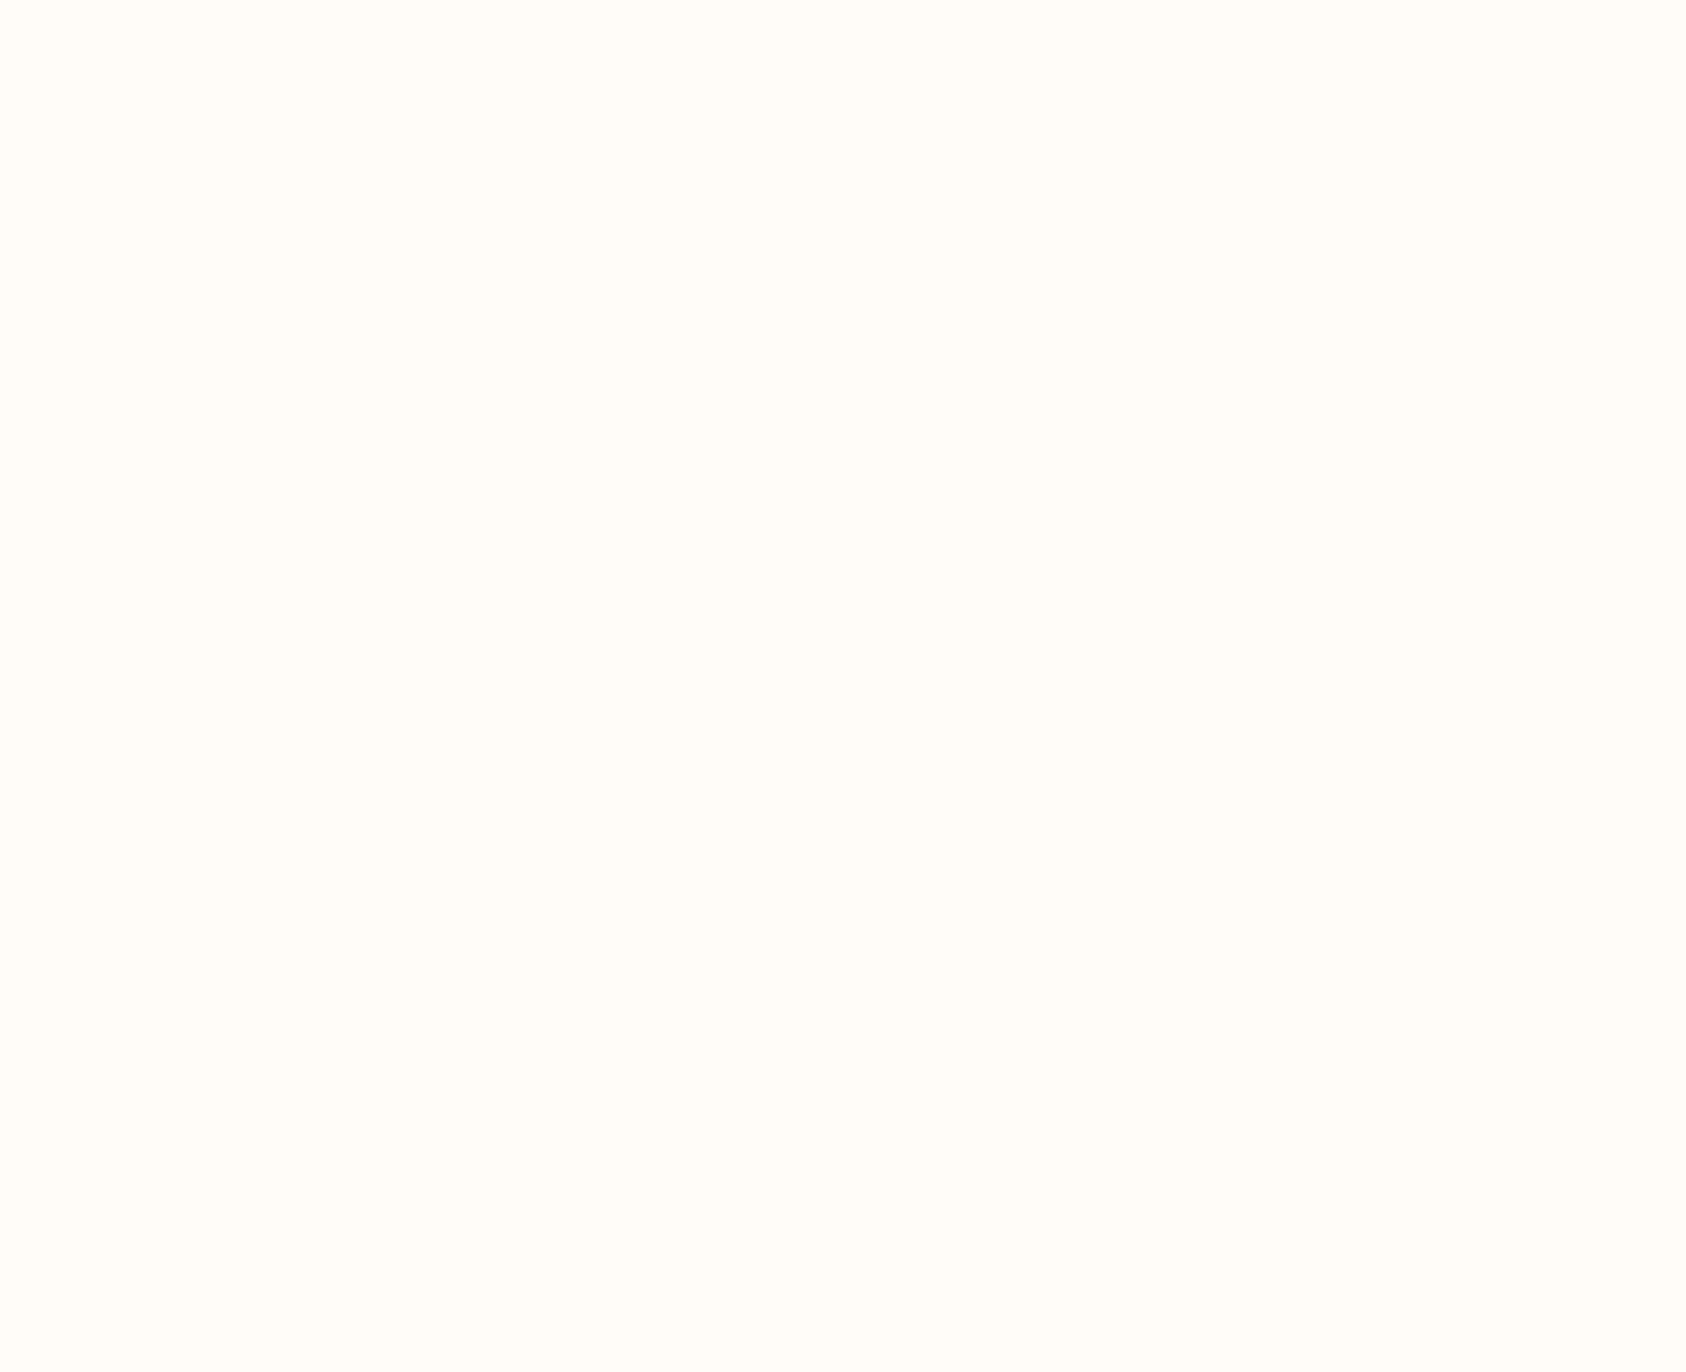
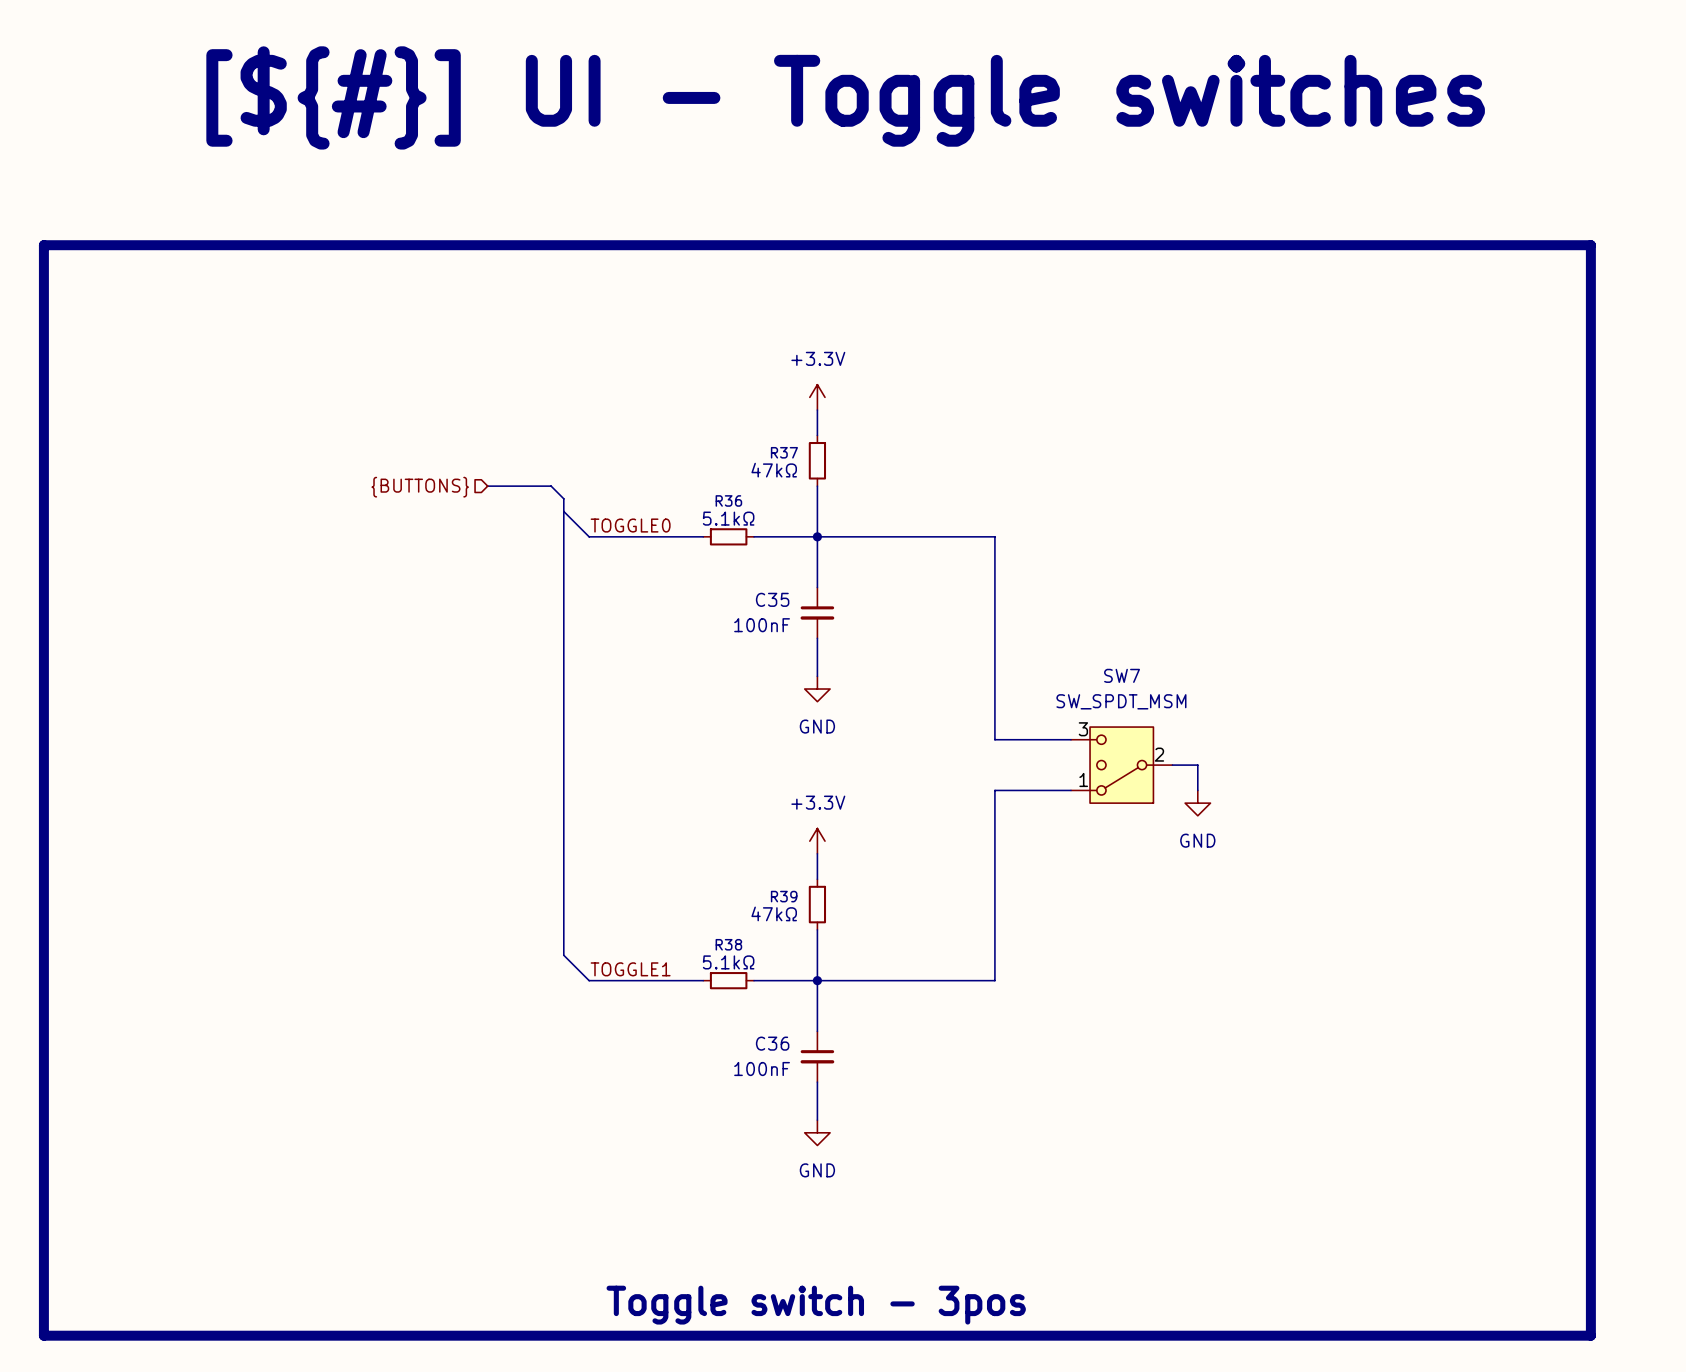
text: none -> [${#}] UI - Toggle switches (845, 97)
line: none -> (43, 245) (1590, 245) (1590, 1335) (43, 1335) (43, 245)
power symbol: none -> +3.3V (817, 397)
wire: none -> (817, 410) (817, 435)
R37: none -> 47kΩ (817, 460)
hierarchical label: none -> {BUTTONS} (420, 487)
bus: none -> (487, 486) (551, 486) (563, 498) (563, 955)
wire: none -> (817, 486) (817, 587)
wire: none -> (563, 511) (589, 536) (703, 536)
label: none -> TOGGLE0 (630, 525)
R36: none -> 5.1kΩ (728, 536)
wire: none -> (754, 536) (994, 536) (994, 739) (1071, 739)
junction: none -> (817, 536)
C35: none -> 100nF (817, 612)
wire: none -> (817, 638) (817, 676)
power symbol: none -> GND (817, 689)
SW7: none -> SW_SPDT_MSM (1121, 765)
wire: none -> (1172, 765) (1197, 765) (1197, 790)
wire: none -> (1071, 790) (994, 790) (994, 980) (754, 980)
power symbol: none -> GND (1197, 803)
power symbol: none -> +3.3V (817, 841)
wire: none -> (817, 853) (817, 879)
R39: none -> 47kΩ (817, 904)
wire: none -> (817, 929) (817, 1031)
wire: none -> (563, 955) (589, 980) (703, 980)
label: none -> TOGGLE1 (630, 969)
R38: none -> 5.1kΩ (728, 980)
junction: none -> (817, 980)
C36: none -> 100nF (817, 1056)
wire: none -> (817, 1082) (817, 1120)
power symbol: none -> GND (817, 1132)
text: none -> Toggle switch - 3pos (816, 1305)

